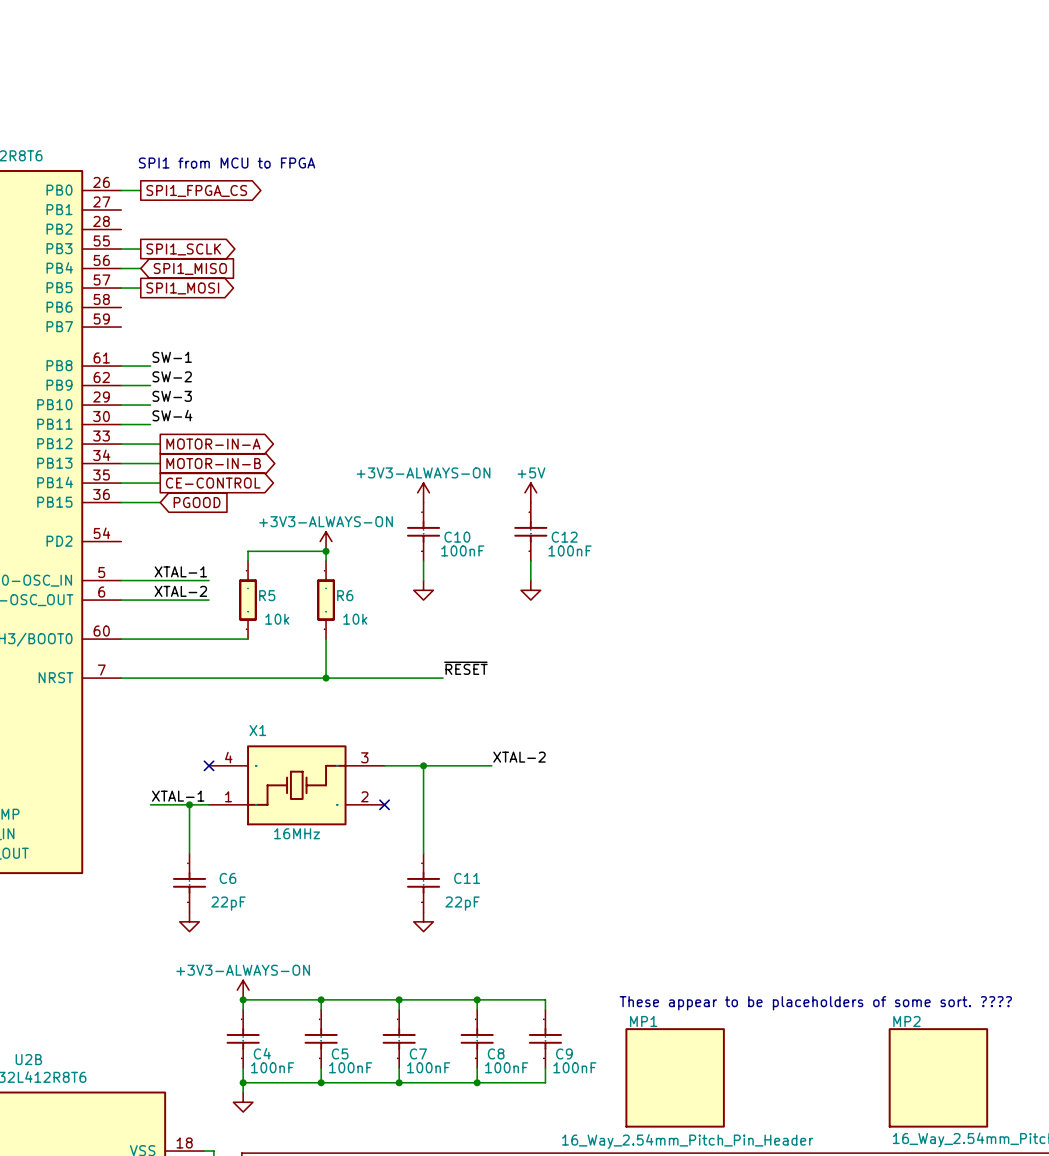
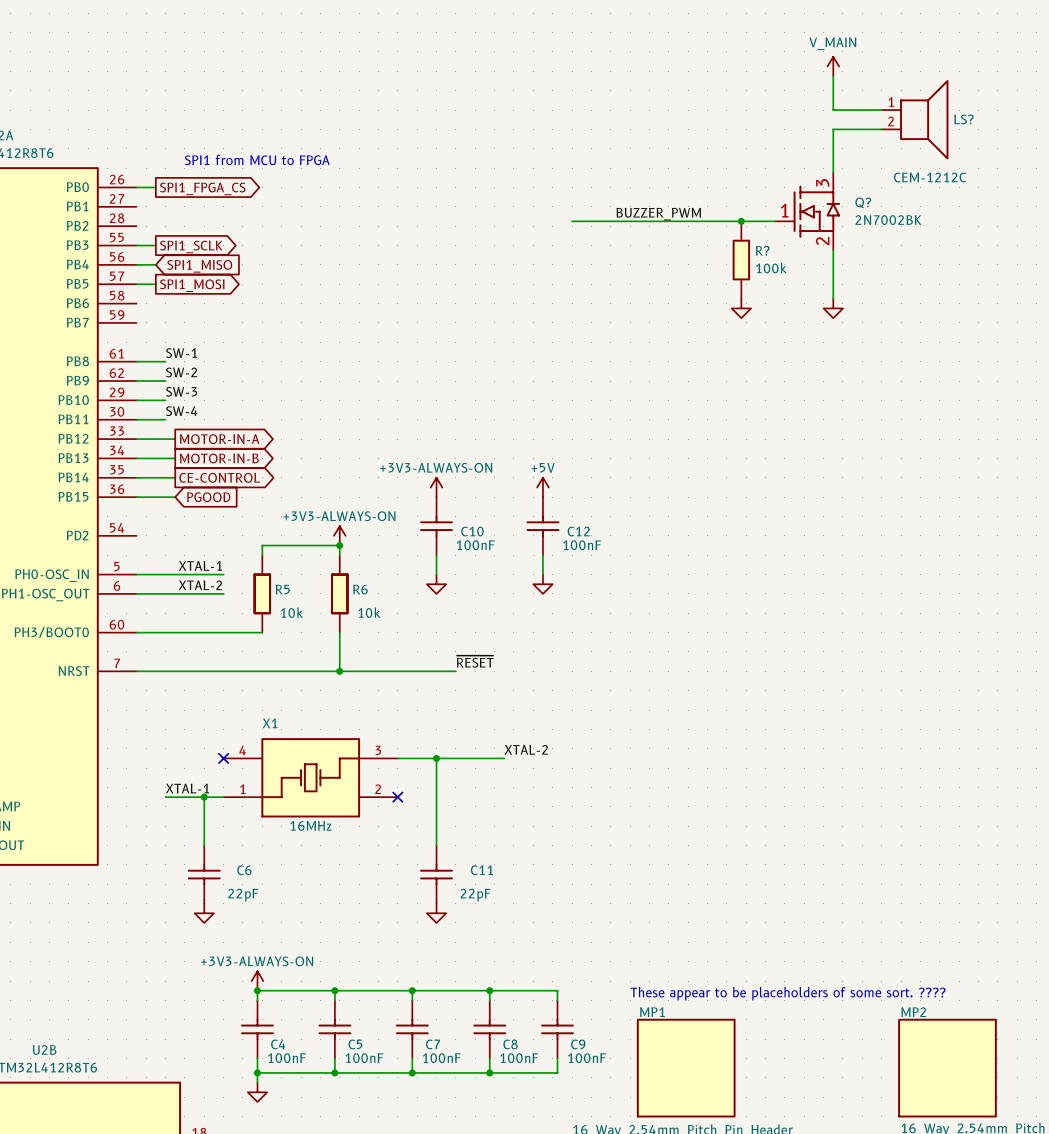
power symbol: none -> V_MAIN (833, 66)
wire: none -> (833, 76) (833, 110) (881, 110)
LS?: none -> (915, 119)
wire: none -> (881, 129) (833, 129) (833, 172)
Q?: none -> 2N7002BK (807, 211)
label: none -> BUZZER_PWM (658, 214)
wire: none -> (572, 221) (775, 221)
junction: none -> (741, 221)
wire: none -> (833, 250) (833, 298)
R?: none -> (741, 260)
power symbol: none -> (741, 308)
power symbol: none -> (833, 308)

